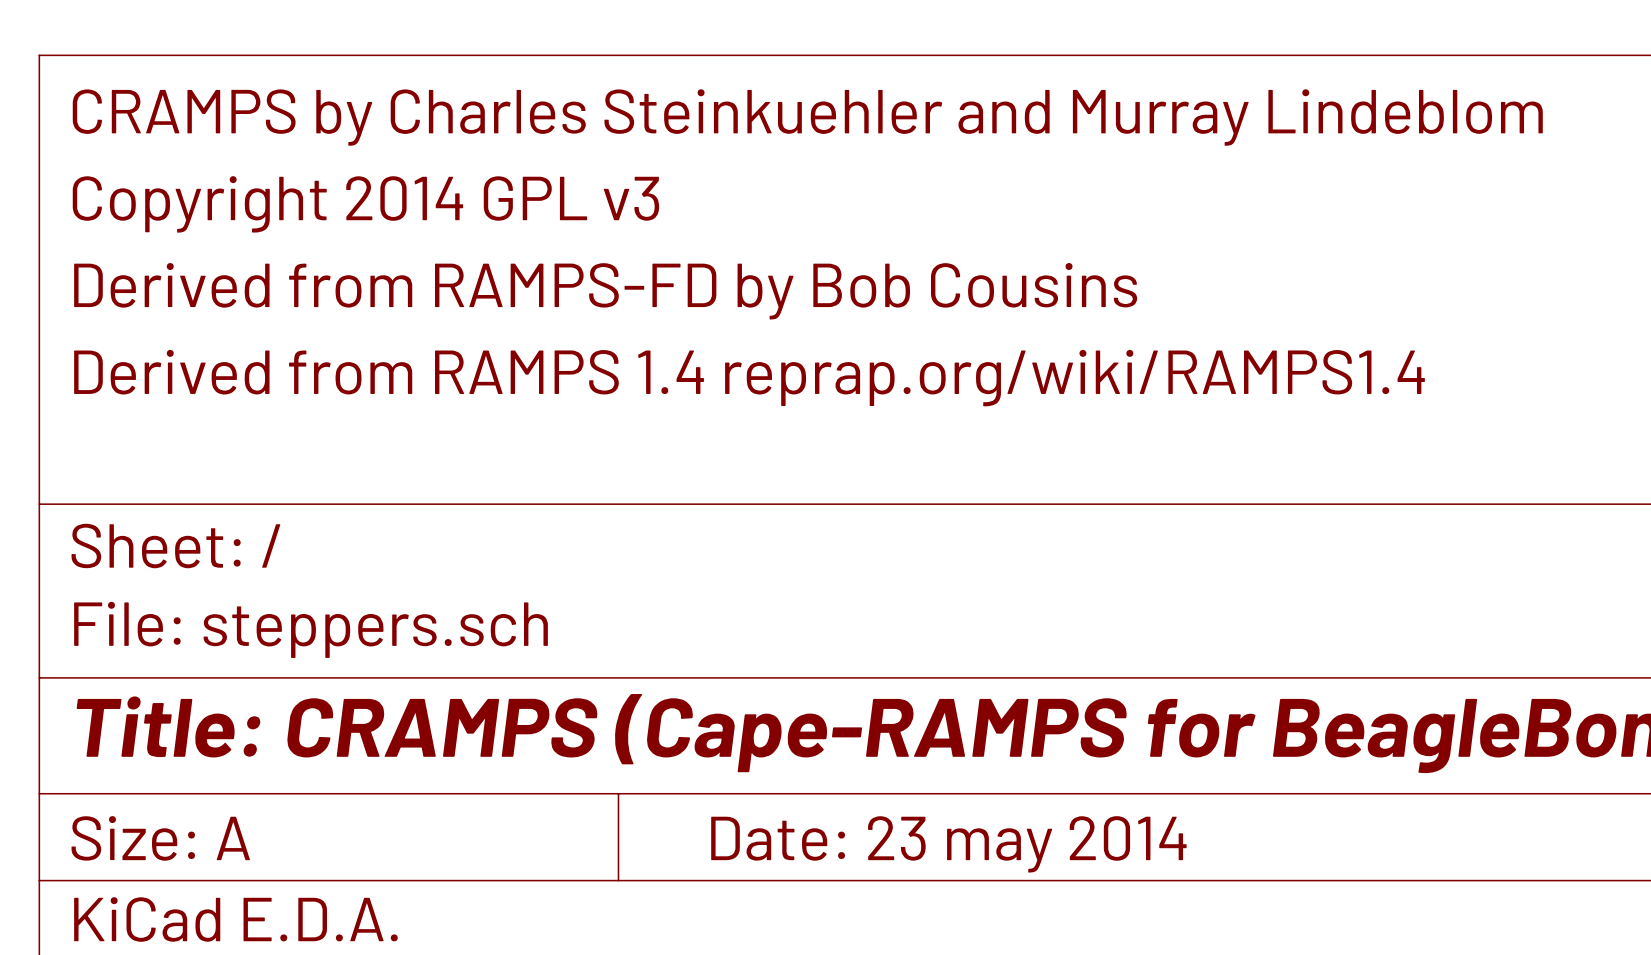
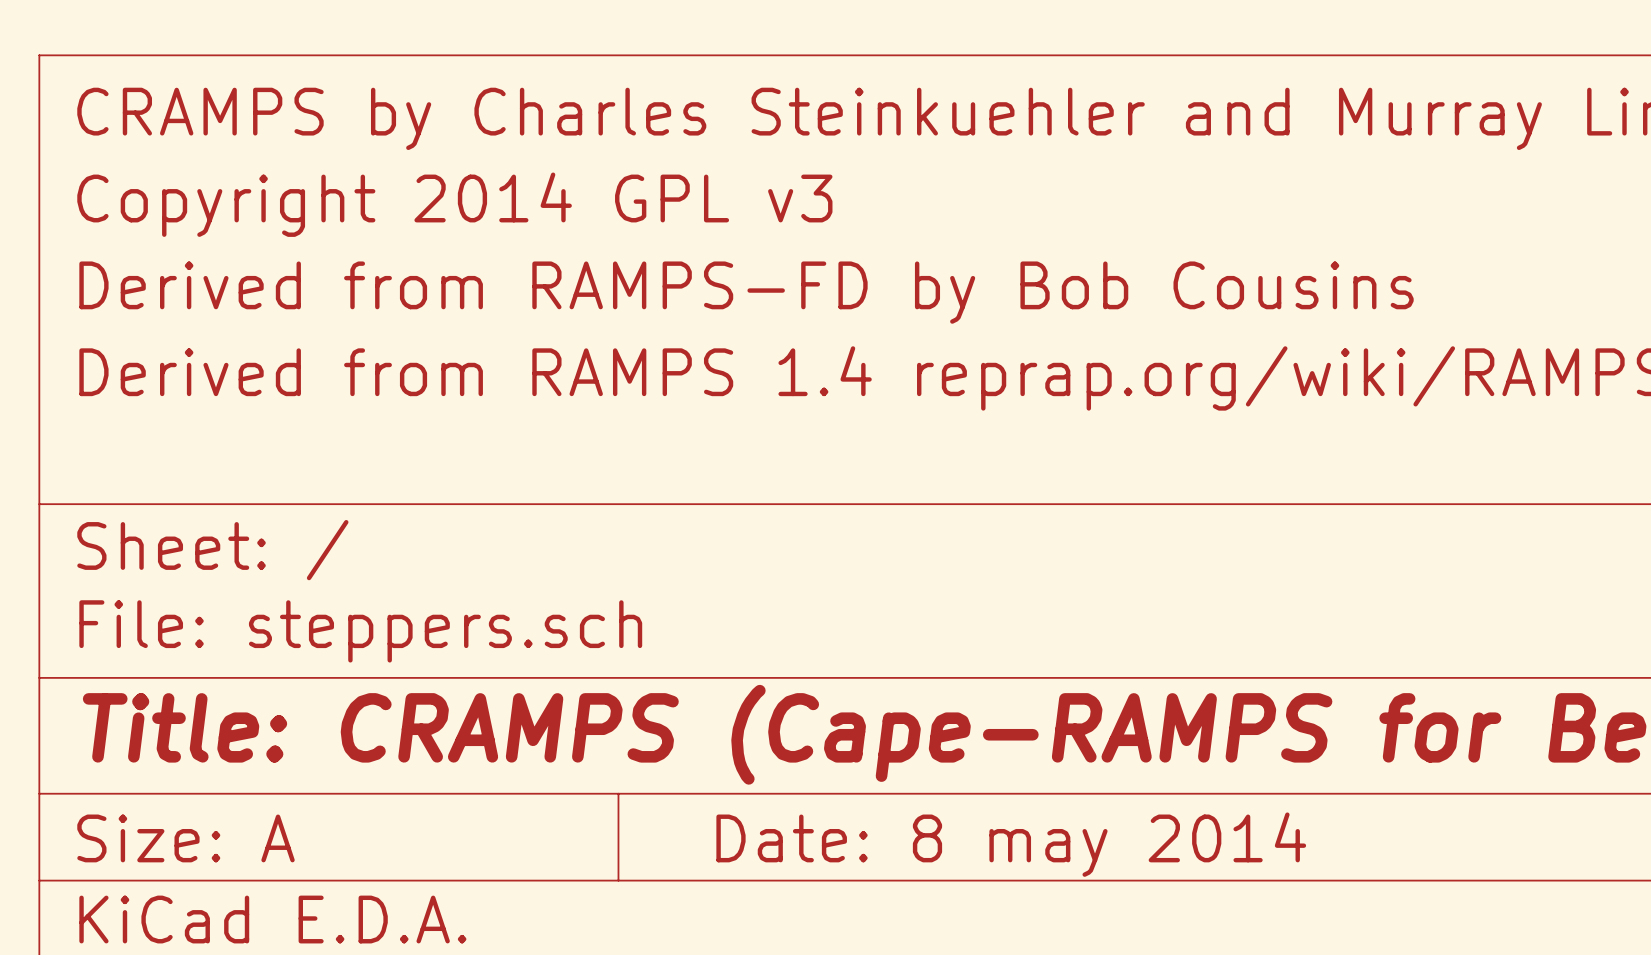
title block: Date: 23 may 2014 (948, 844) -> Date: 8 may 2014 (1011, 844)

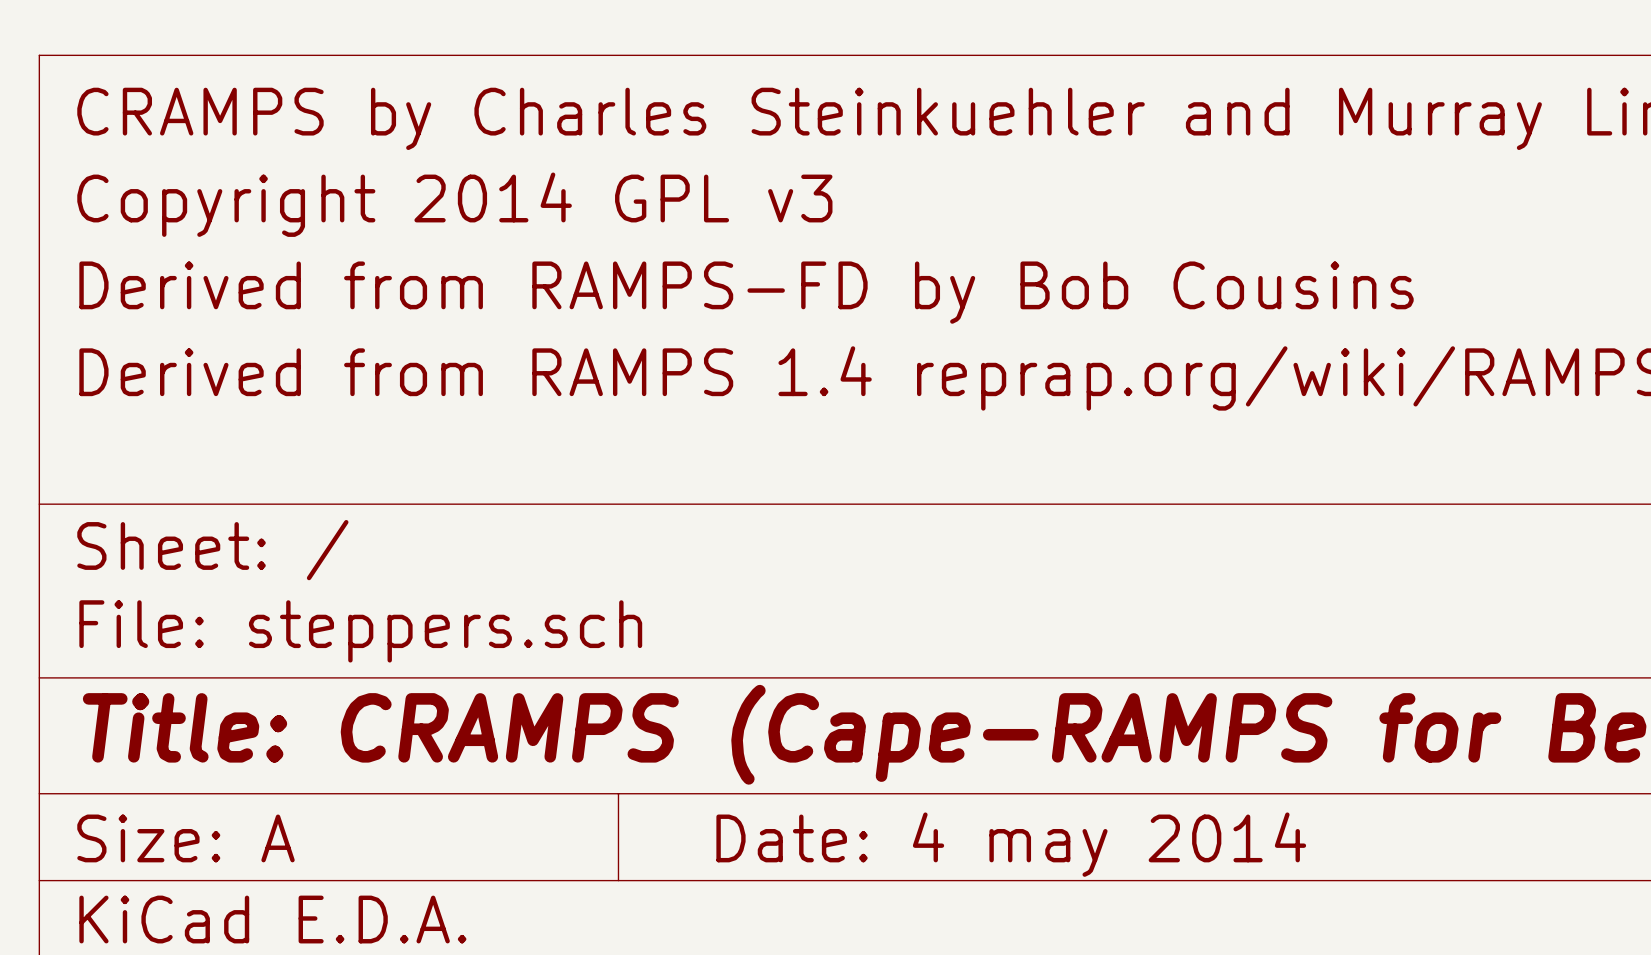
title block: Date: 8 may 2014 (1011, 844) -> Date: 4 may 2014 (1011, 844)

